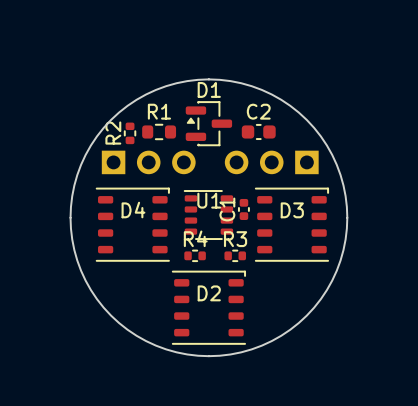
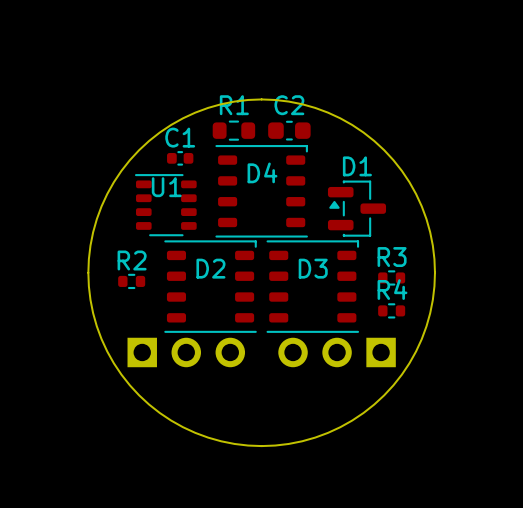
D1 position: (208, 123) -> (356, 208)
R1 position: (159, 131) -> (233, 130)
C2 position: (258, 131) -> (289, 130)
R2 rotation: 0° (130, 133) -> 90° clockwise (131, 281)
R2 position: (130, 133) -> (131, 281)
part: (148, 162) -> none
part: (271, 162) -> none
C1 rotation: 0° (243, 209) -> 90° clockwise (180, 158)
C1 position: (243, 209) -> (180, 158)
U1 position: (208, 215) -> (165, 205)
D4 position: (132, 224) -> (261, 191)
D3 position: (291, 224) -> (312, 286)
R4 position: (195, 255) -> (391, 310)
R3 position: (235, 255) -> (391, 277)
part: none -> (186, 352)
part: none -> (337, 352)
D2 position: (208, 307) -> (210, 286)

